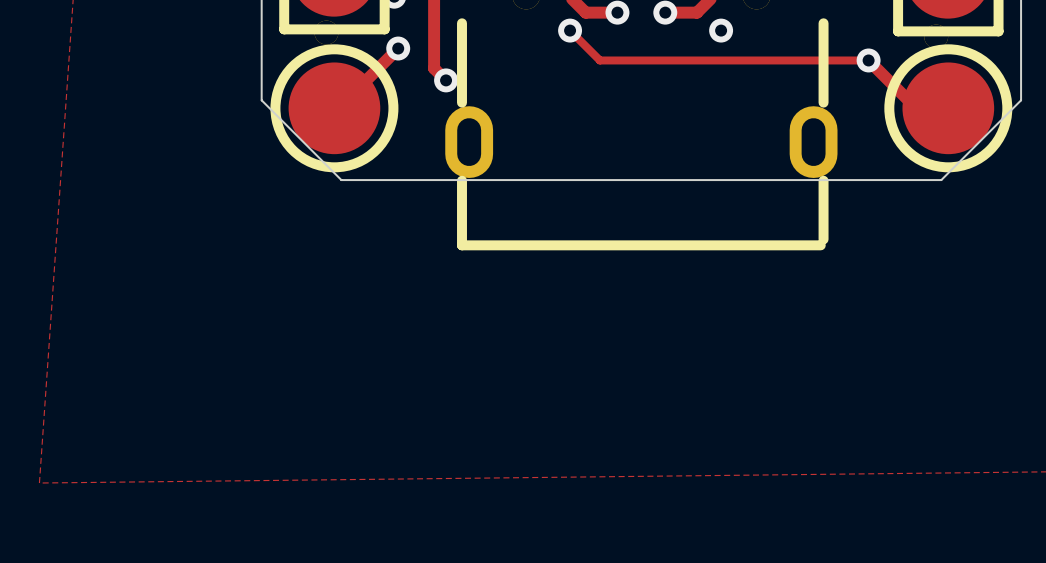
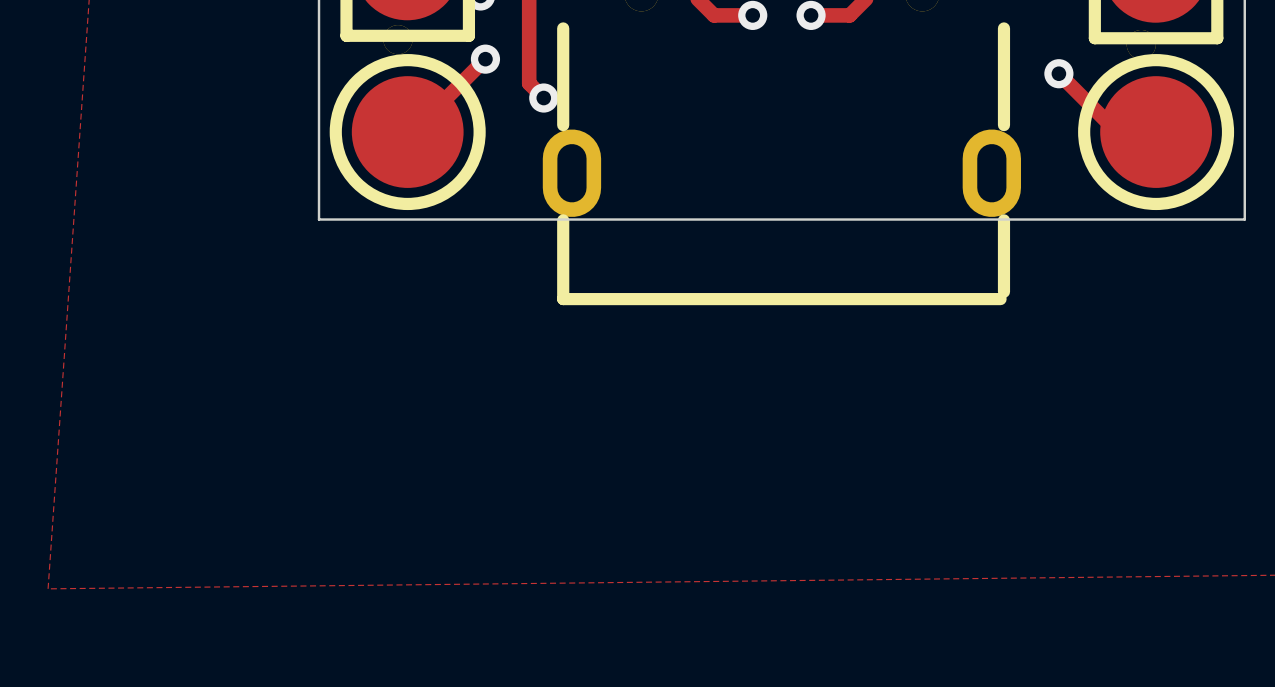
track: (570, 30) (599, 60) (868, 60) -> none
via: (570, 30) -> none
via: (721, 30) -> none
board edge: (261, 100) (341, 180) -> (319, 122) (319, 219) (416, 219)
board edge: (1021, 100) (941, 180) -> (1244, 122) (1244, 219) (1147, 219)

